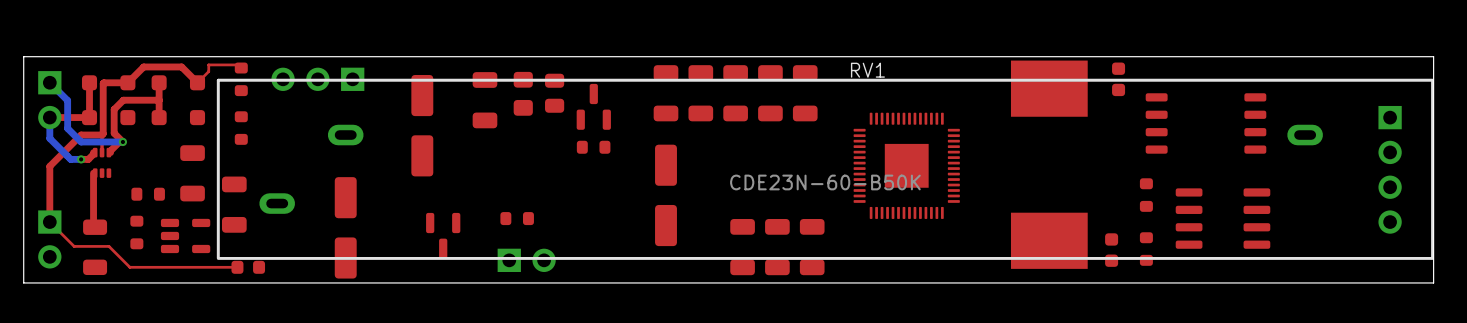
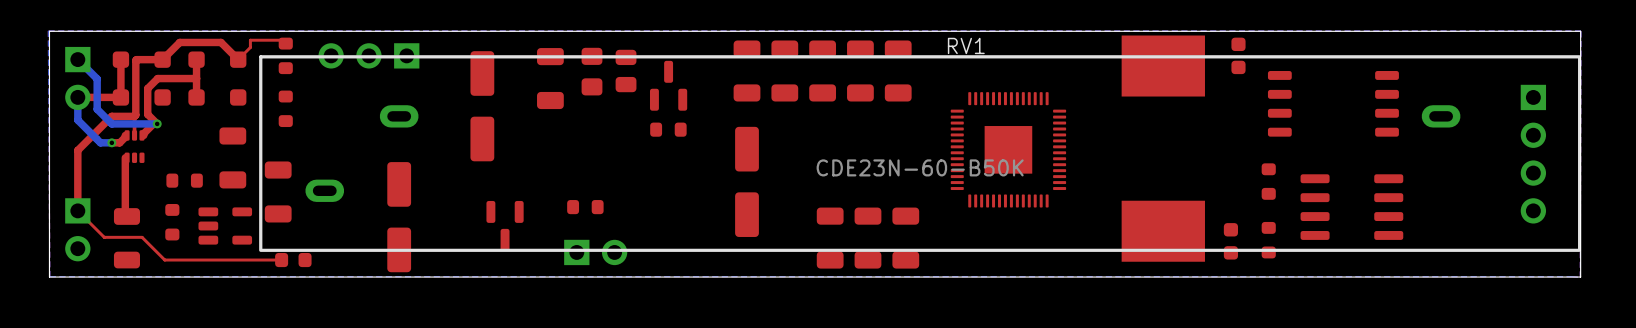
bottom zone outline: none -> (1581, 30) (1580, 277) (49, 276) (48, 30) (1581, 30)

